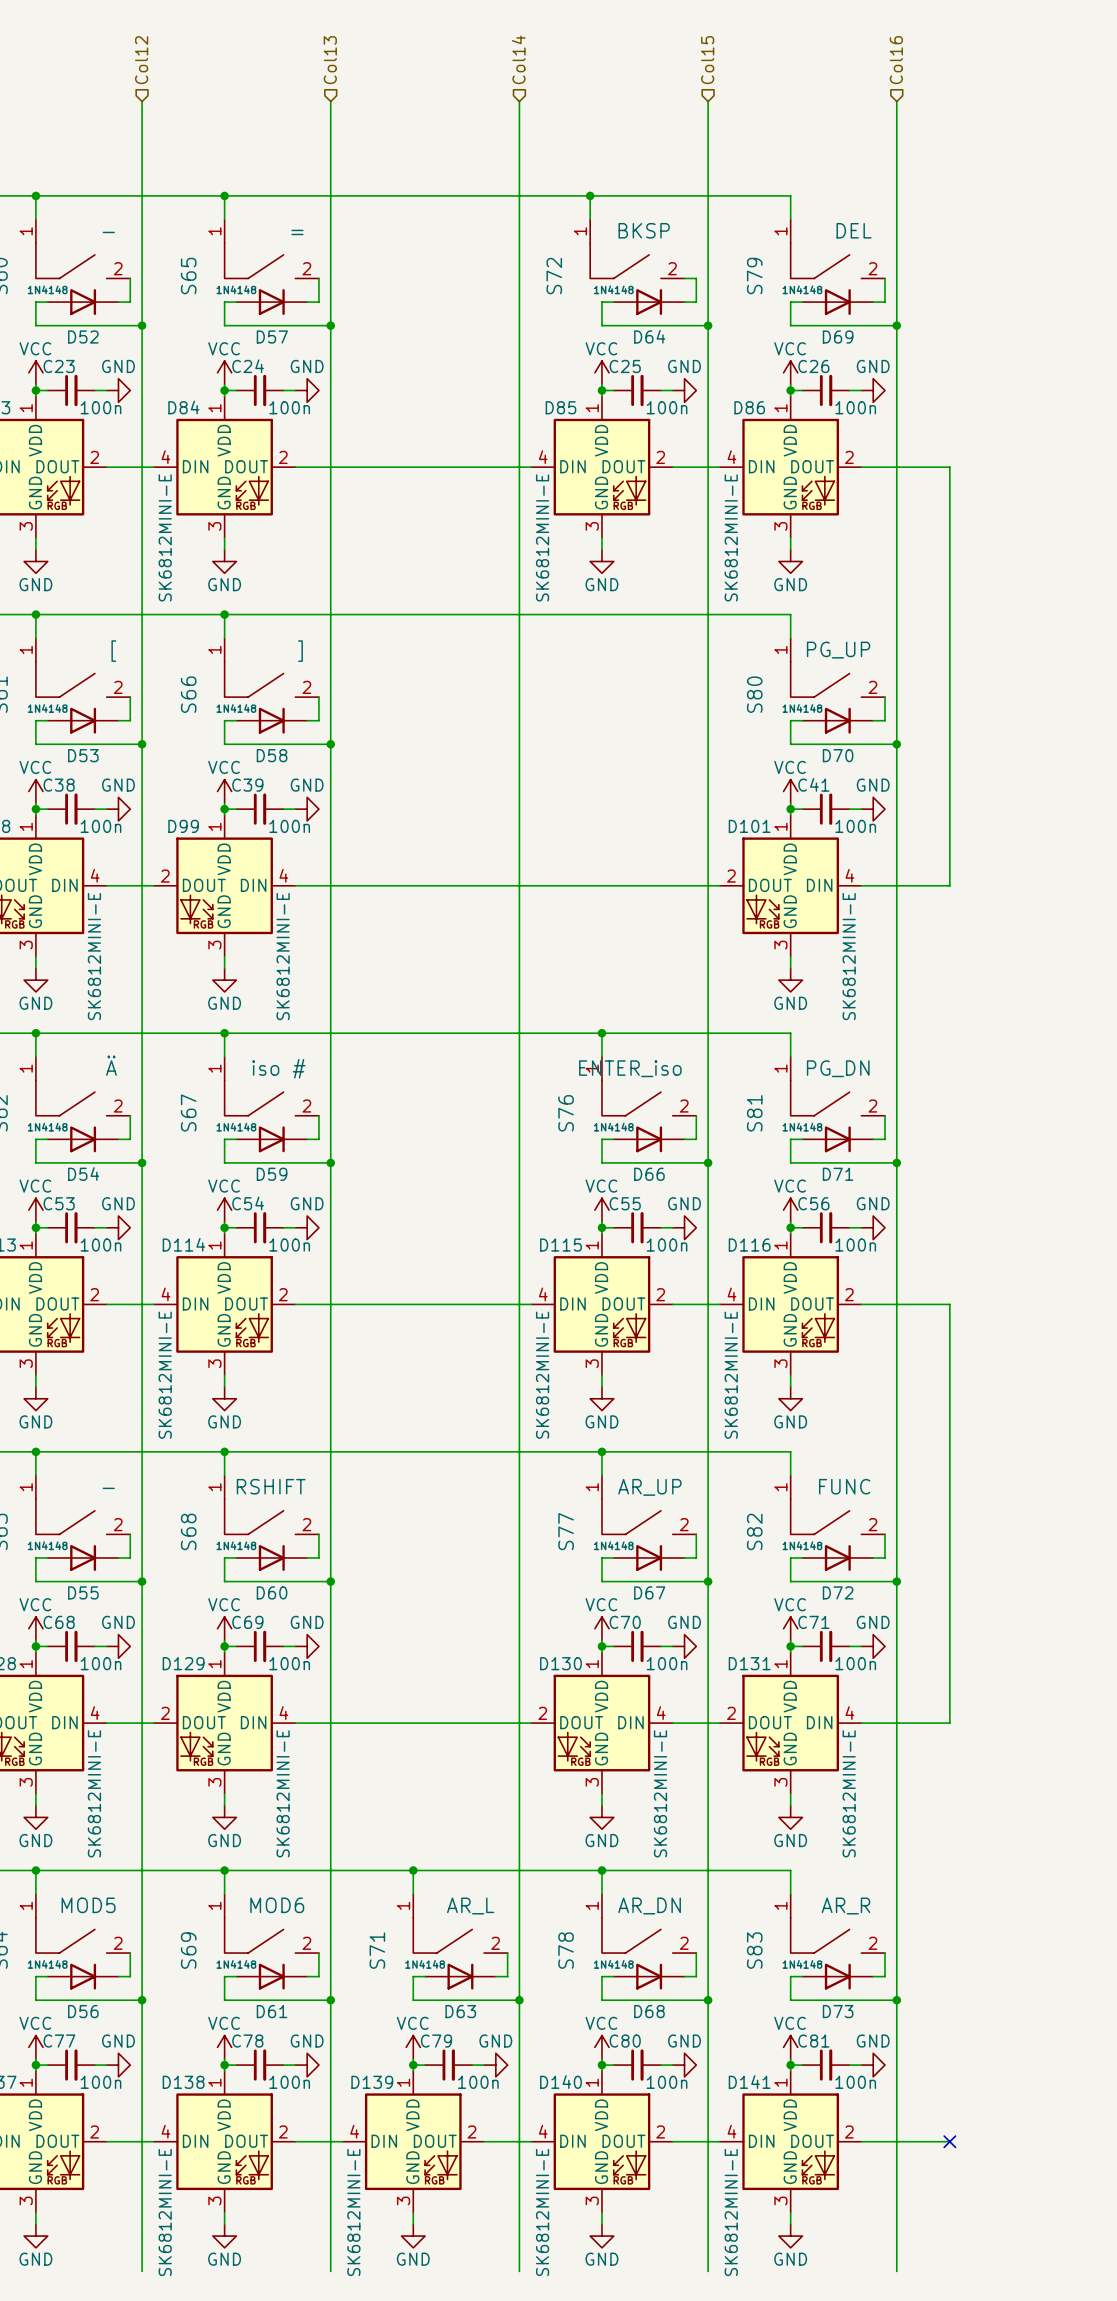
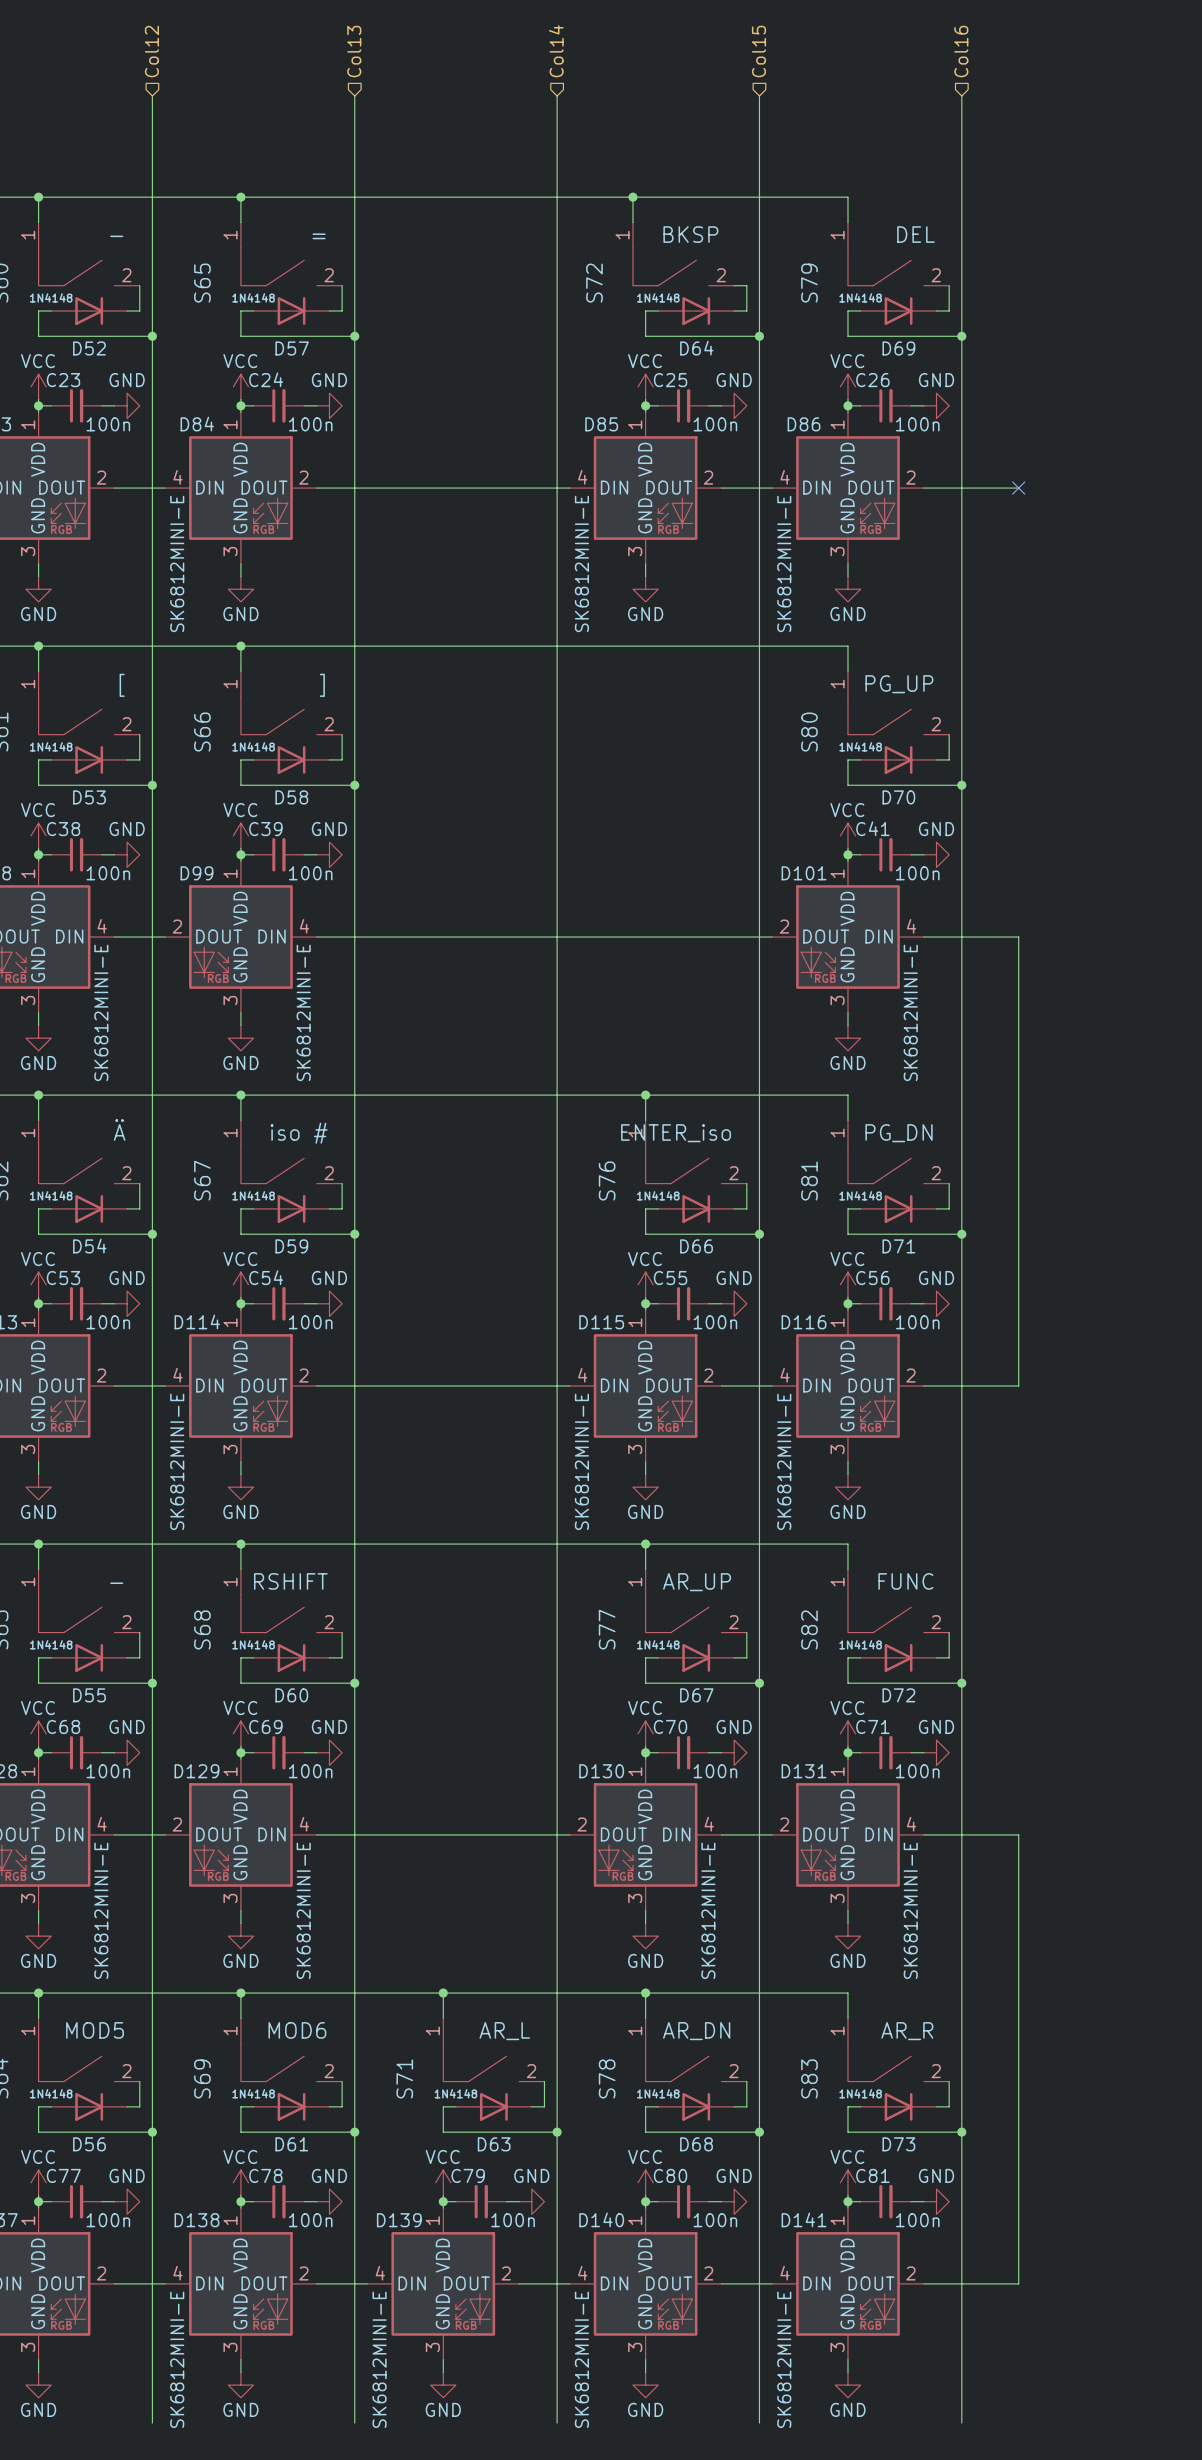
wire: (949, 467) (949, 885) -> (1018, 1385) (1018, 937)
no-connect mark: none -> (1018, 488)
wire: (949, 1304) (949, 1723) -> (1018, 2283) (1018, 1834)
no-connect mark: (949, 2141) -> none

